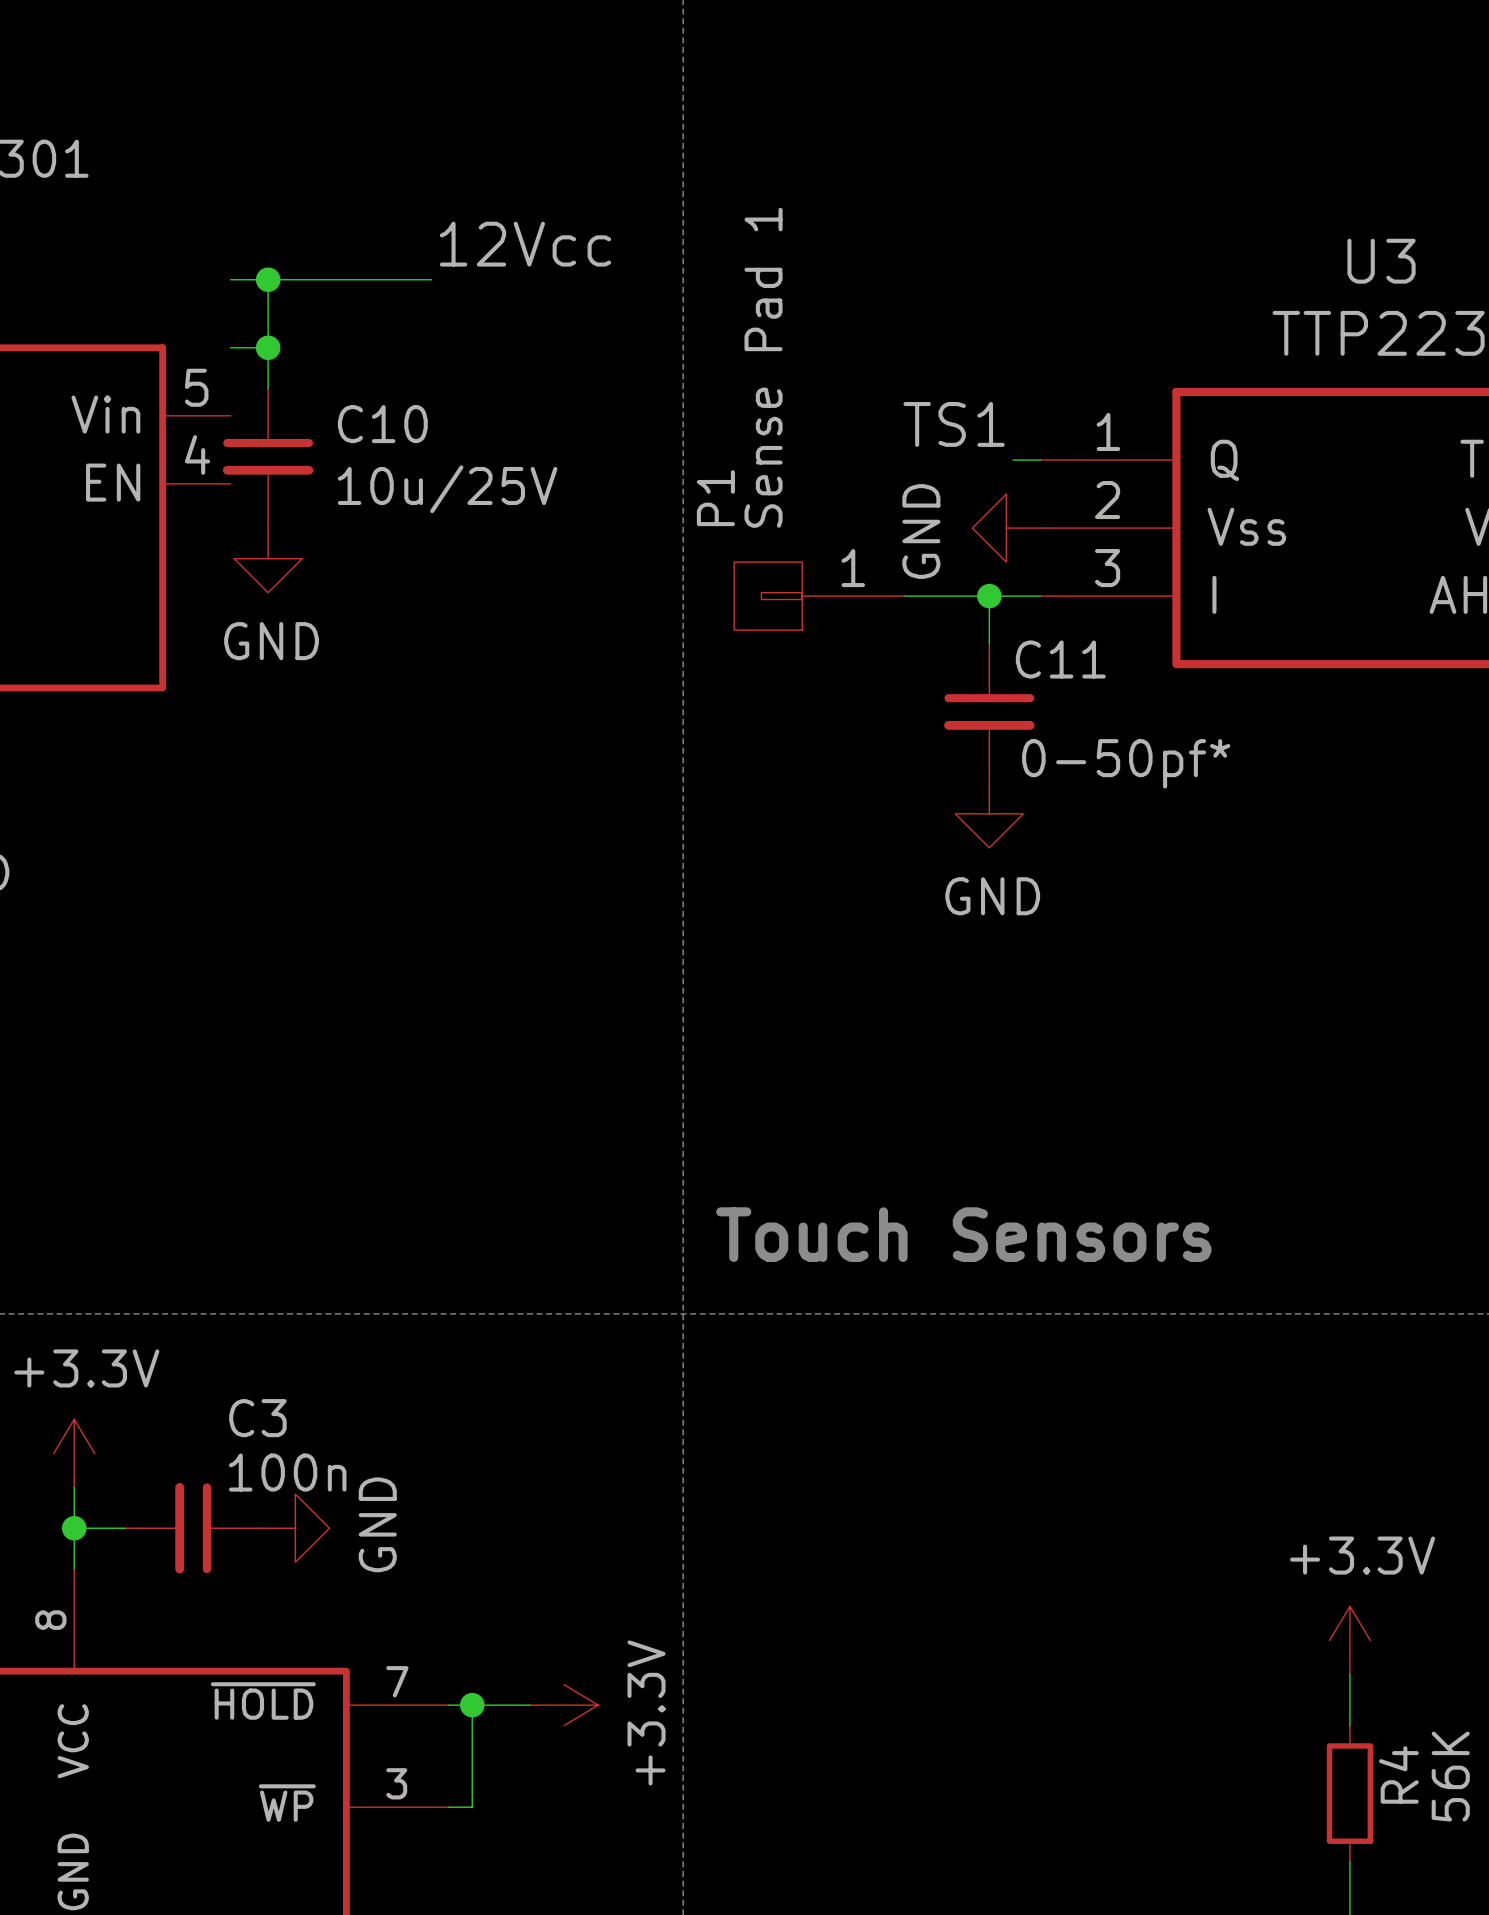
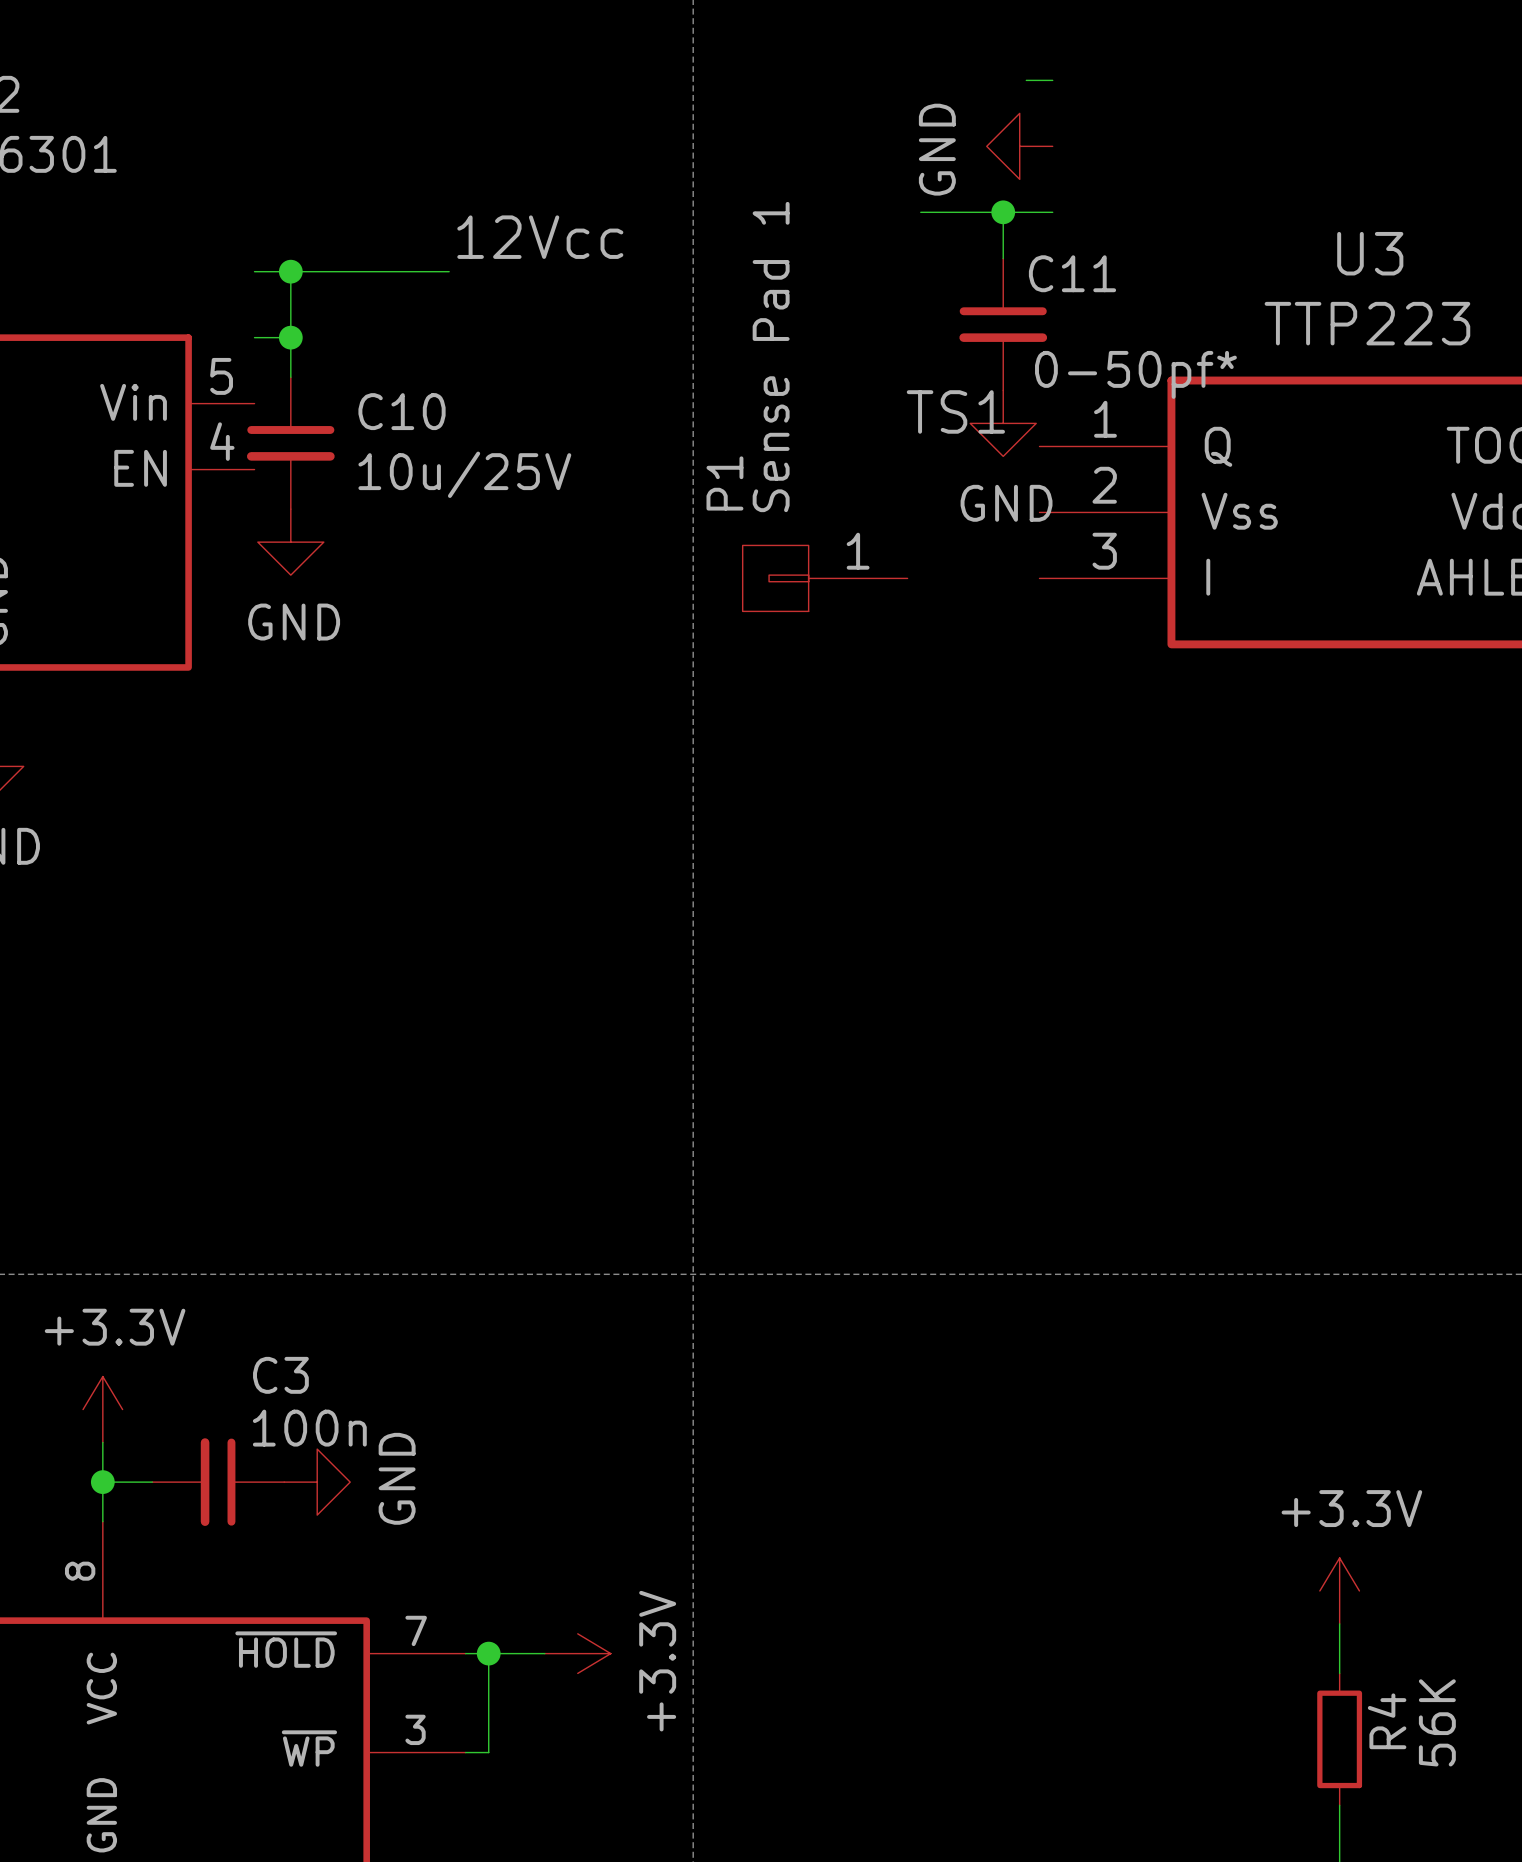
power symbol: none -> GND (1019, 146)
junction: none -> (1003, 212)
wire: (1013, 460) (1040, 460) -> (1026, 80) (1052, 80)
power symbol rotation: 0° (1006, 528) -> 90° counterclockwise (1003, 423)
power symbol position: GND (1006, 528) -> GND (1003, 423)
wire: (904, 596) (1040, 596) -> (920, 212) (1052, 212)
wire: (989, 596) (989, 643) -> (1003, 212) (1003, 258)
junction: (989, 596) -> none
C11 position: (989, 711) -> (1003, 324)
power symbol: GND (989, 813) -> none
text: Touch Sensors (963, 1234) -> none

